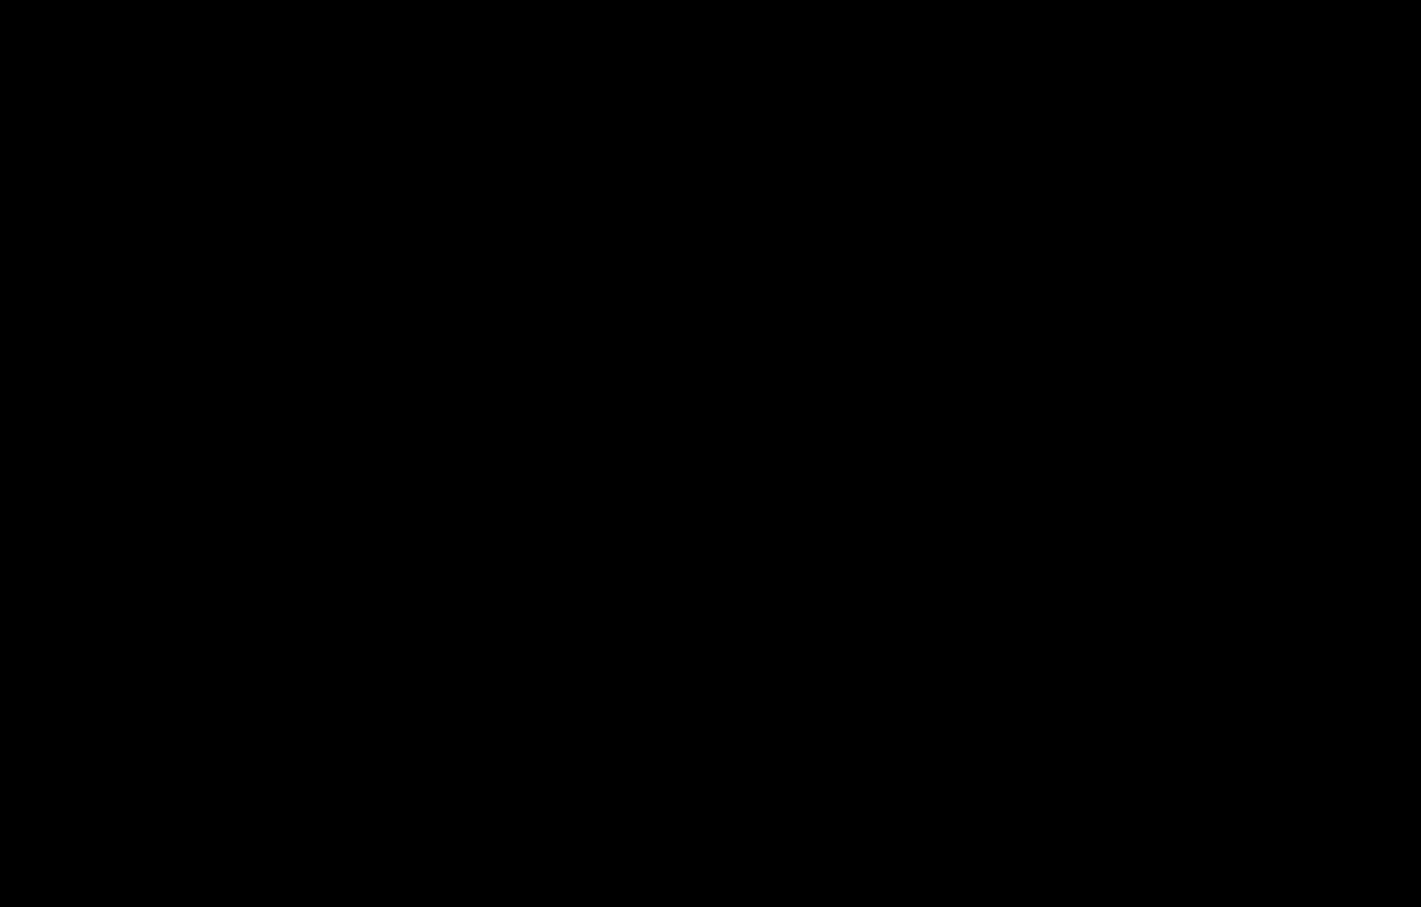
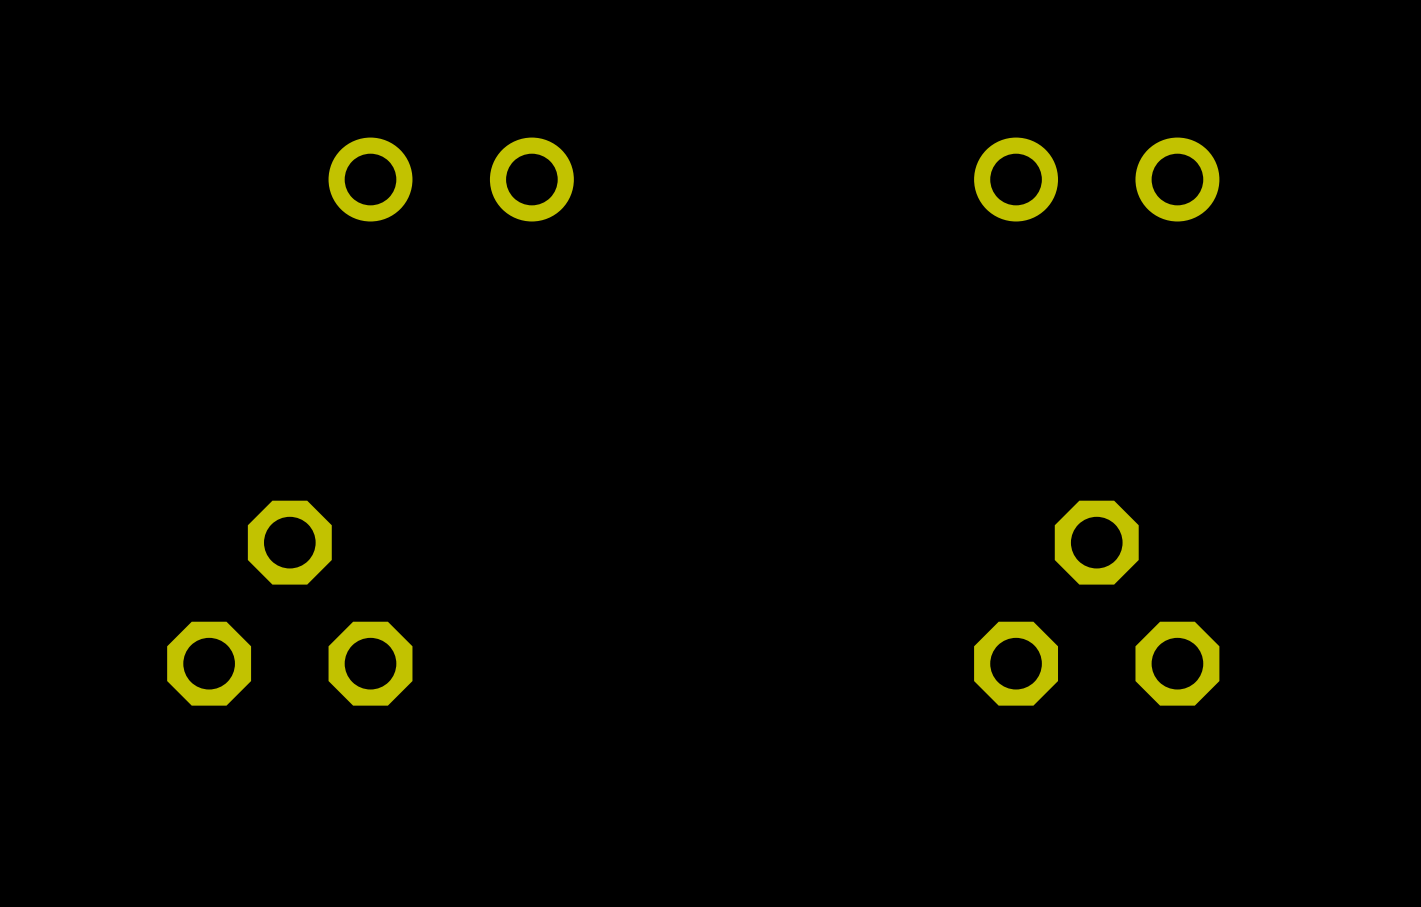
part: none -> (451, 179)
part: none -> (1096, 179)
part: none -> (289, 603)
part: none -> (1096, 603)

